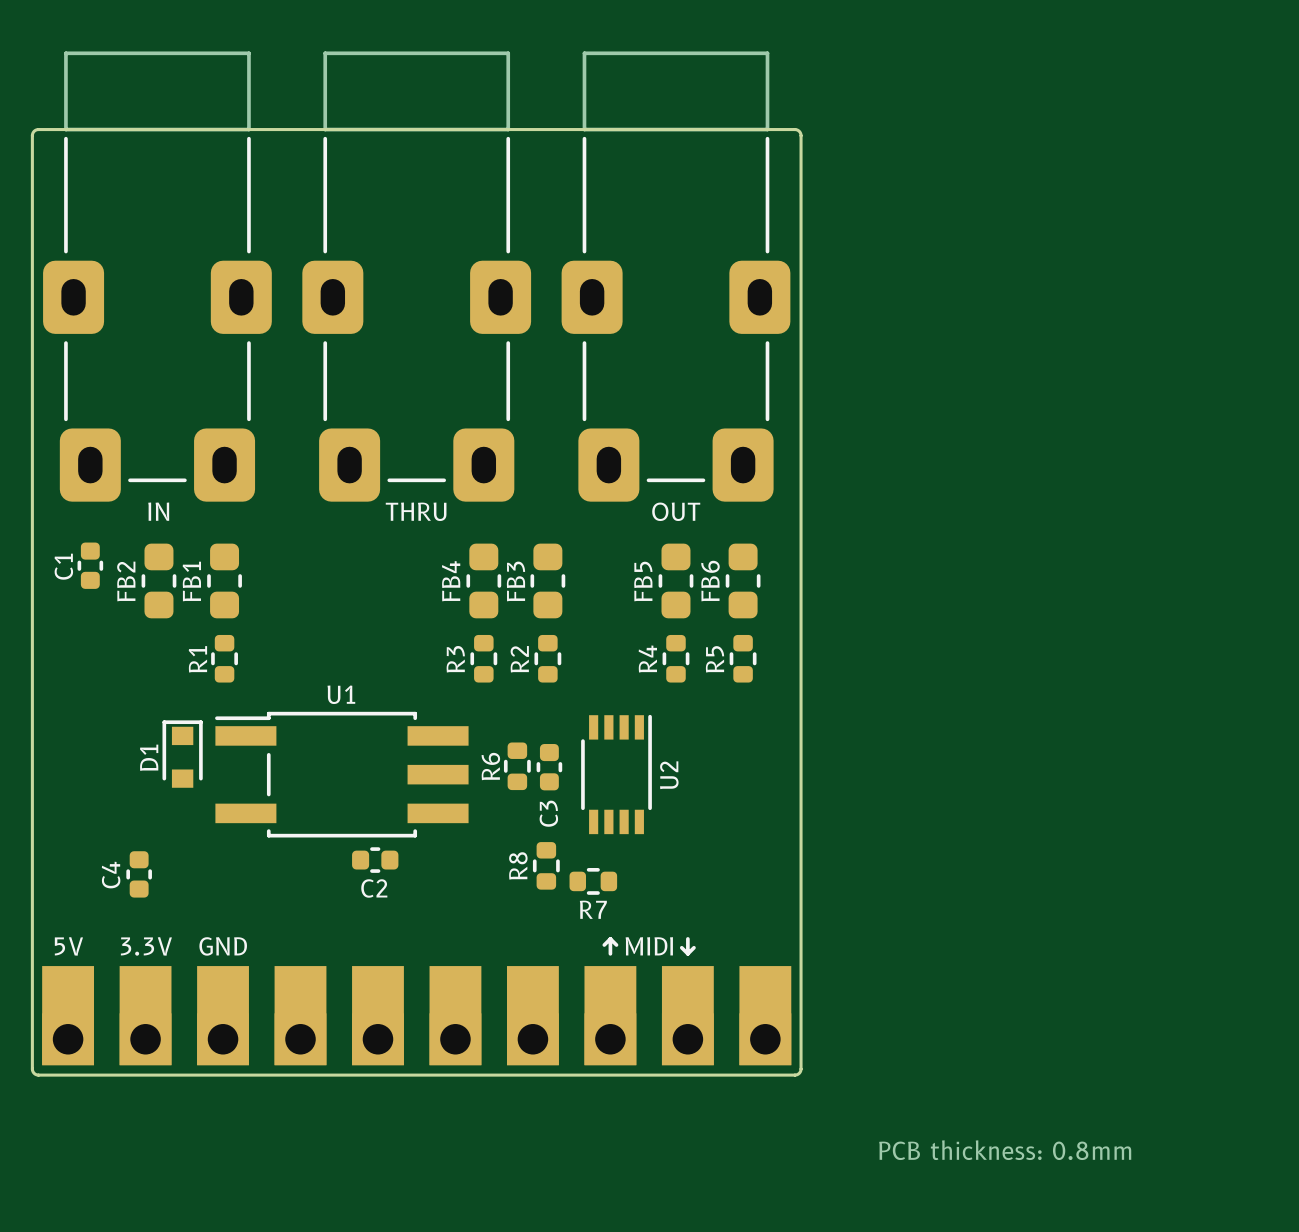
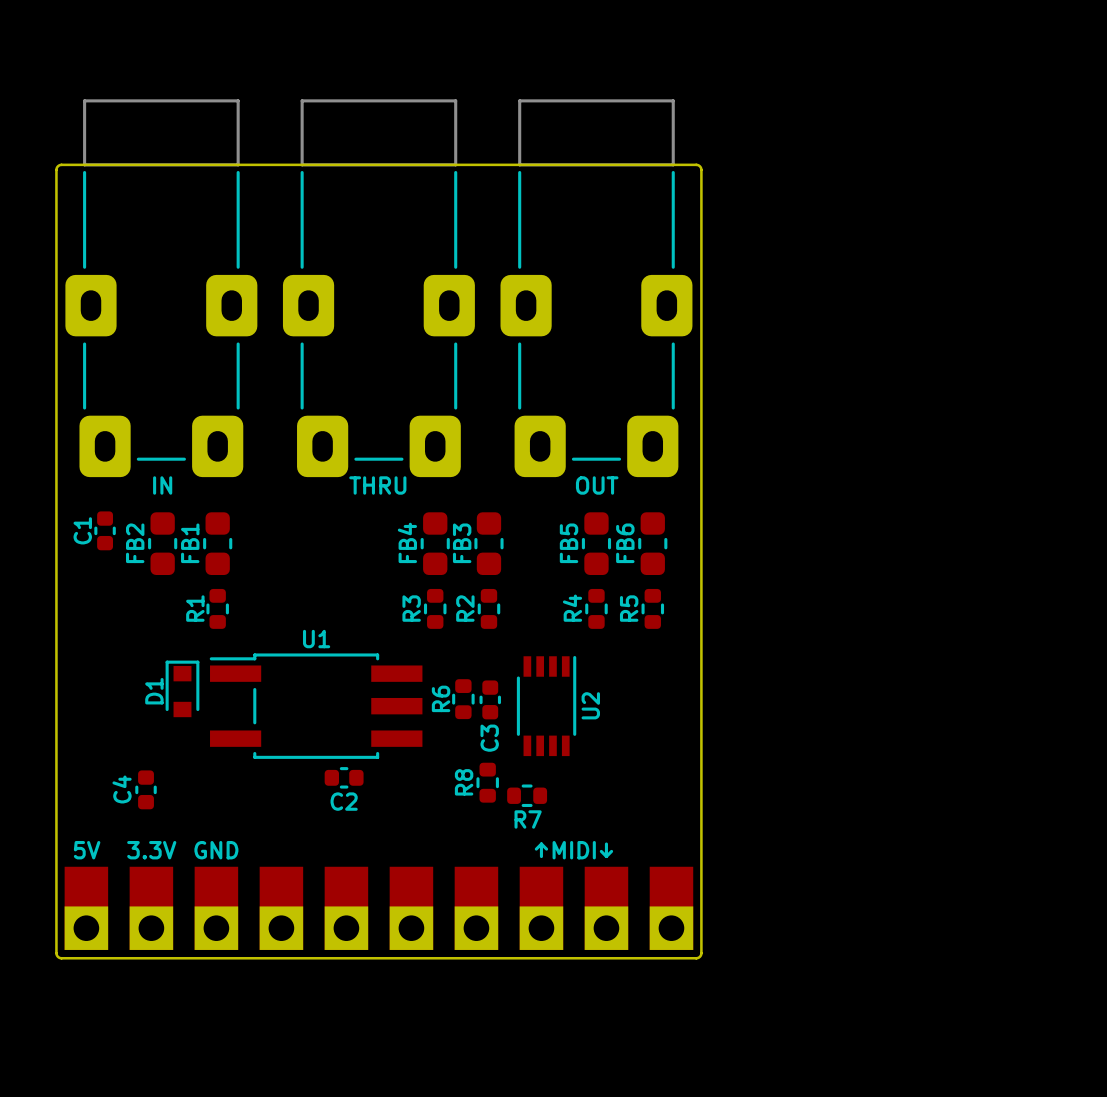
text: PCB thickness: 0.8mm (1005, 1150) -> none

